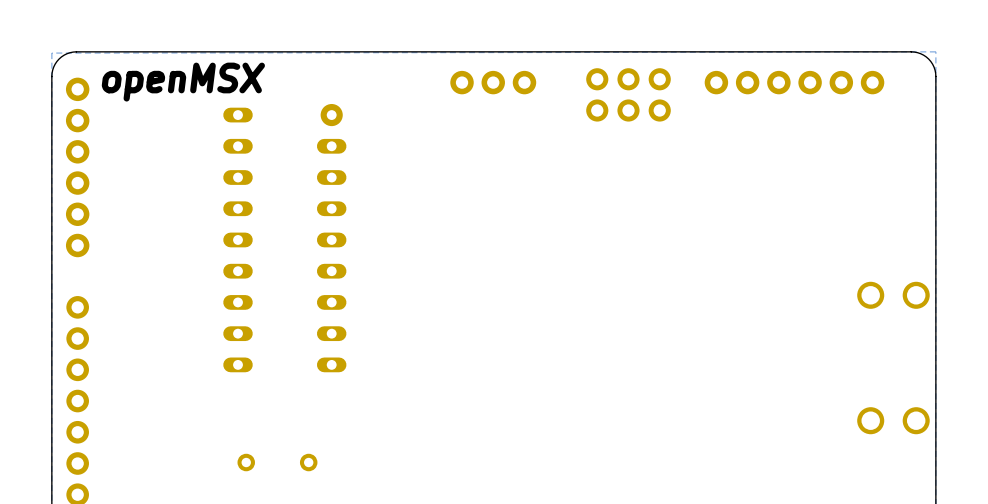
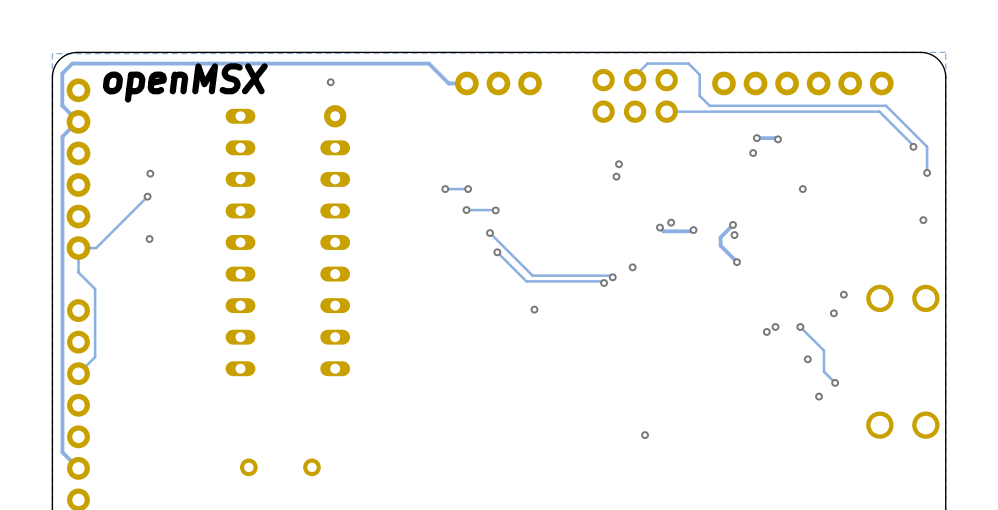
track: none -> (635, 80) (635, 76) (647, 63) (688, 63) (699, 74) (699, 95) (709, 105) (886, 105) (927, 146) (927, 172)
via: none -> (330, 82)
track: none -> (466, 83) (448, 83) (428, 63) (72, 63) (62, 73) (62, 105) (78, 121) (62, 136) (62, 452) (78, 468)
track: none -> (666, 111) (879, 111) (913, 146)
track: none -> (756, 138) (778, 139)
via: none -> (756, 138)
via: none -> (778, 139)
via: none -> (913, 146)
via: none -> (753, 153)
via: none -> (618, 164)
via: none -> (150, 173)
via: none -> (927, 172)
via: none -> (616, 176)
via: none -> (445, 189)
track: none -> (468, 189) (445, 189)
via: none -> (468, 189)
via: none -> (802, 189)
track: none -> (147, 196) (96, 248) (78, 248) (78, 272) (95, 289) (95, 357) (78, 373)
via: none -> (147, 196)
track: none -> (466, 210) (495, 210)
via: none -> (466, 210)
via: none -> (495, 210)
via: none -> (923, 220)
via: none -> (671, 222)
track: none -> (733, 224) (720, 237) (720, 245) (737, 262)
via: none -> (733, 224)
track: none -> (659, 227) (663, 231) (693, 230)
via: none -> (659, 227)
via: none -> (693, 230)
track: none -> (489, 233) (532, 275) (611, 275) (612, 277)
via: none -> (489, 233)
via: none -> (734, 235)
via: none -> (149, 239)
track: none -> (497, 252) (526, 281) (602, 281) (604, 283)
via: none -> (497, 252)
via: none -> (737, 262)
via: none -> (632, 267)
via: none -> (612, 277)
via: none -> (604, 283)
via: none -> (843, 294)
via: none -> (534, 309)
via: none -> (833, 313)
via: none -> (775, 326)
track: none -> (800, 326) (823, 350) (823, 371) (835, 382)
via: none -> (800, 326)
via: none -> (766, 331)
via: none -> (807, 359)
via: none -> (835, 382)
via: none -> (819, 396)
via: none -> (645, 435)

